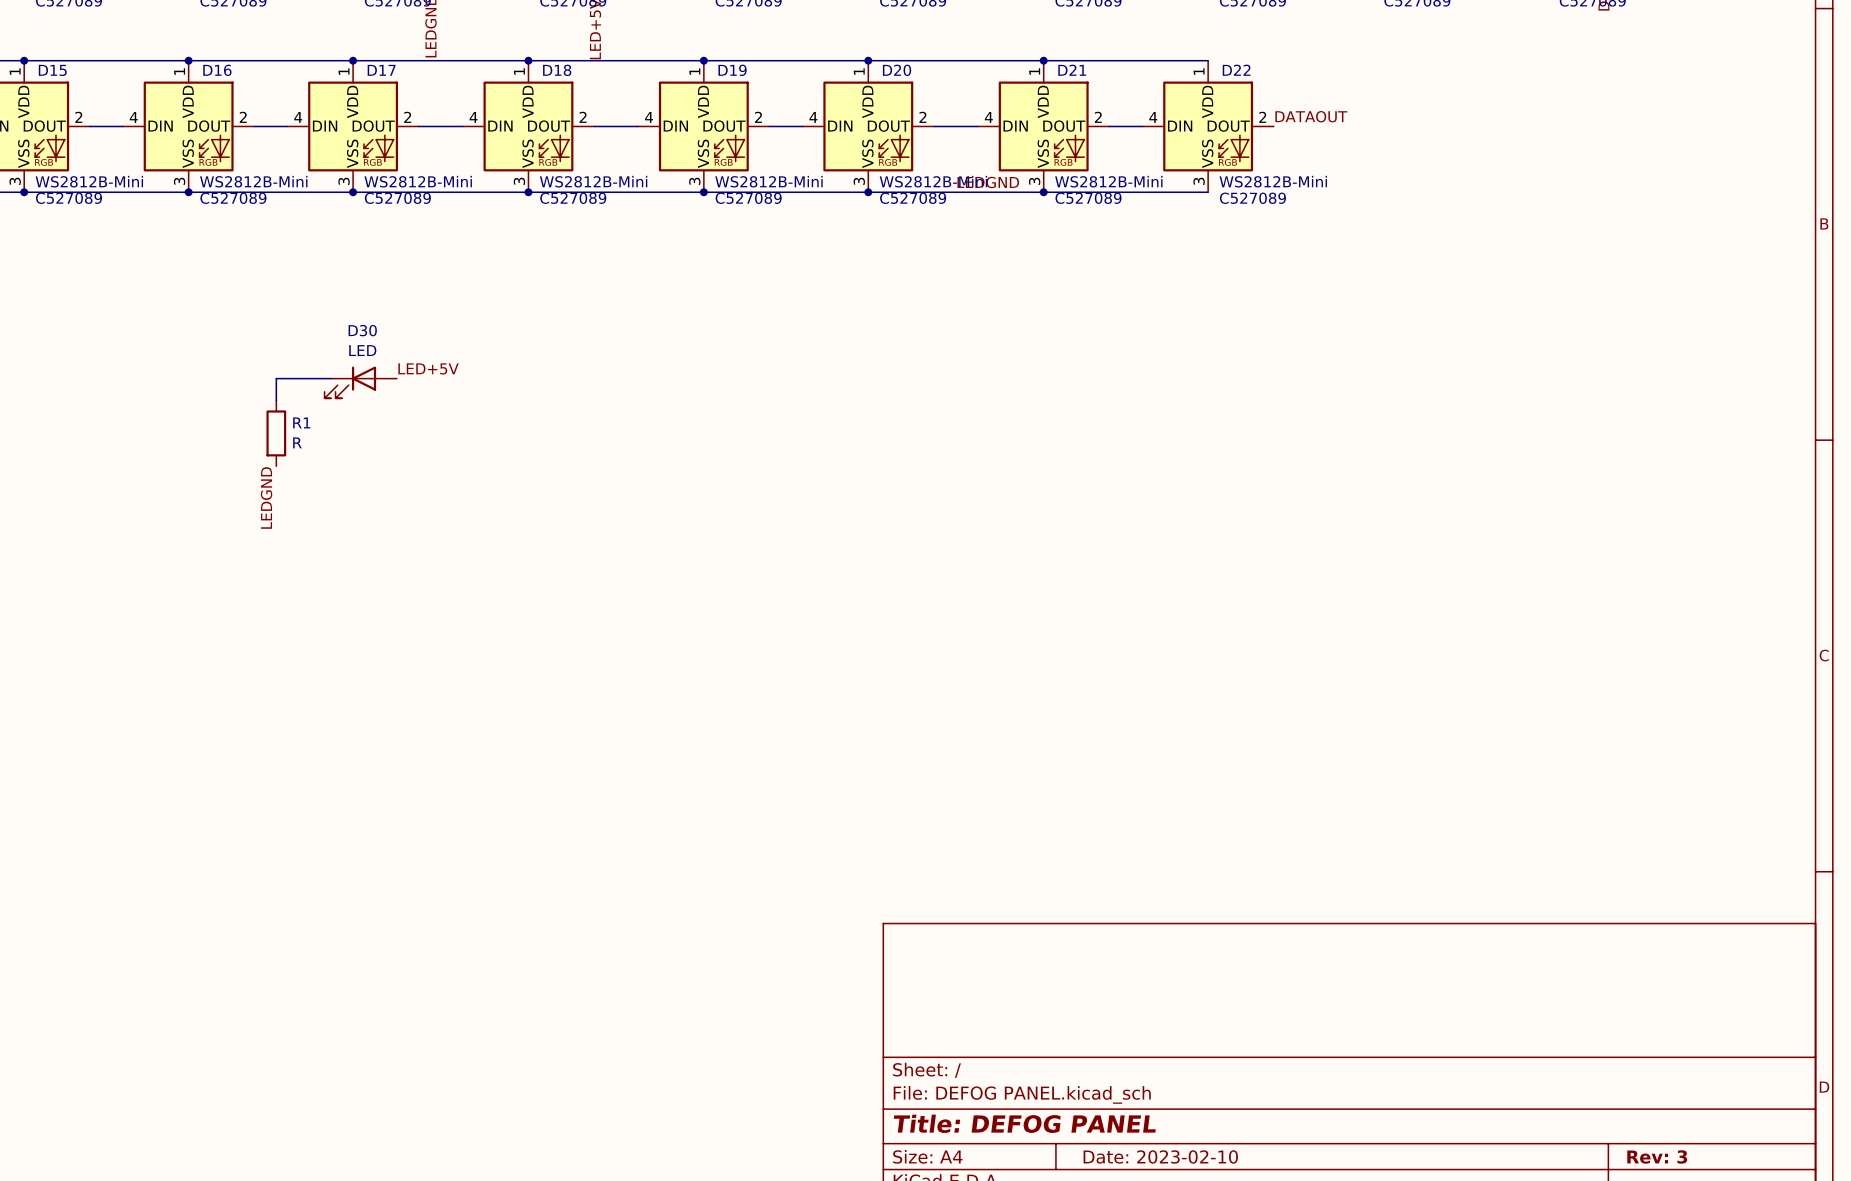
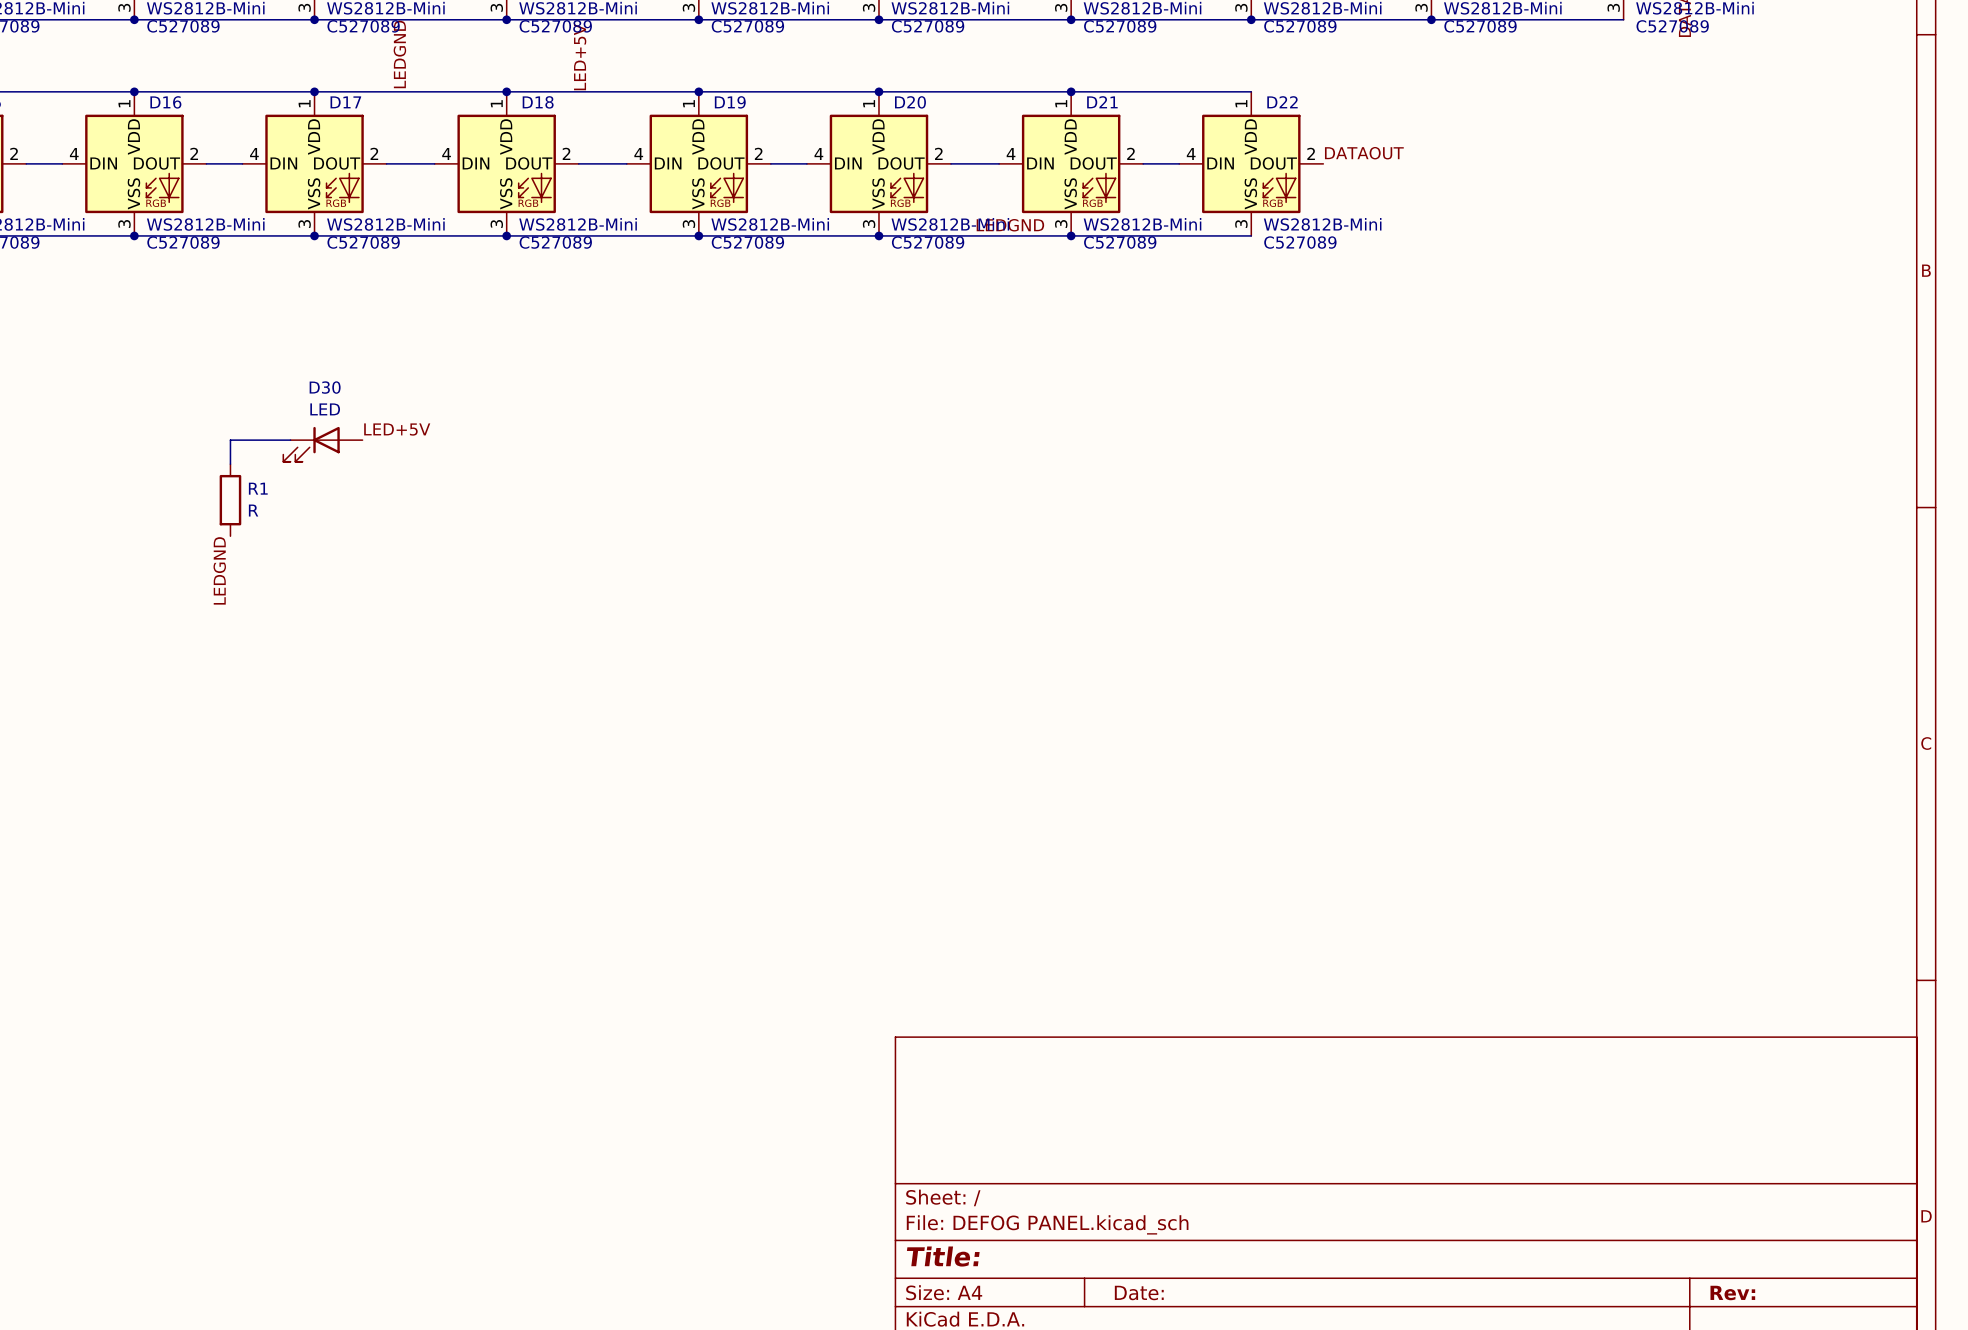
title block: Title: DEFOG PANEL (1024, 1123) -> Title: (943, 1256)
title block: Date: 2023-02-10 (1160, 1156) -> Date: (1139, 1292)
title block: Rev: 3 (1657, 1156) -> Rev: (1732, 1292)

